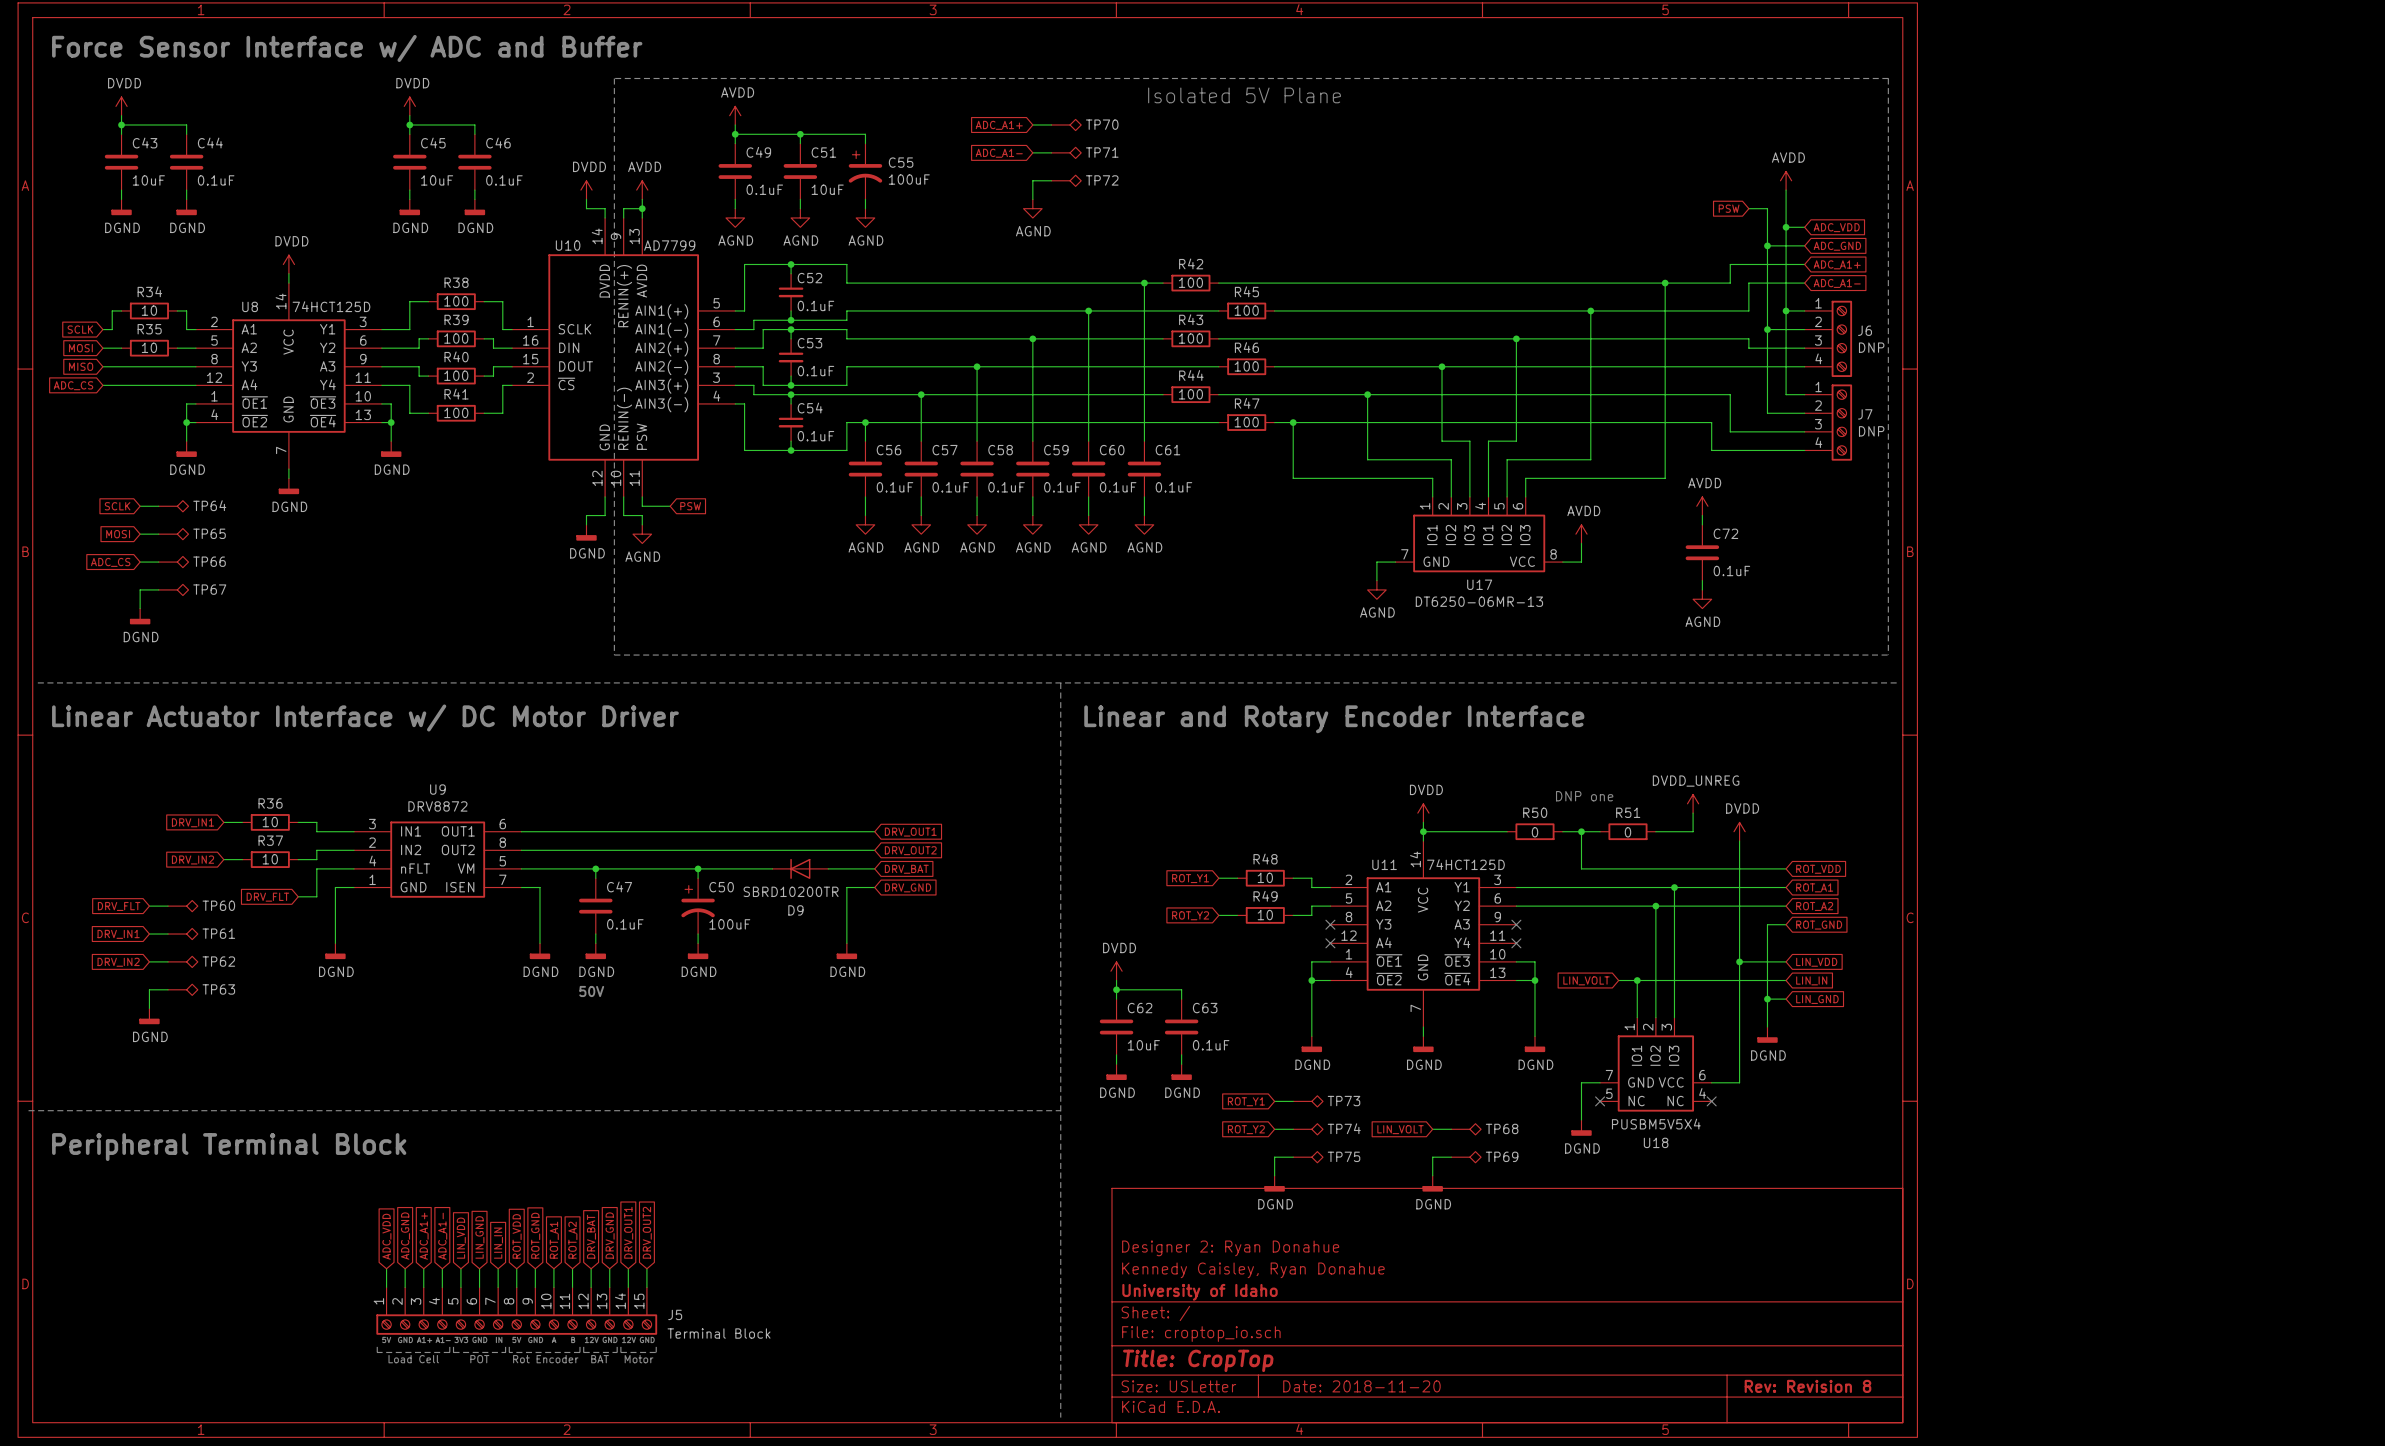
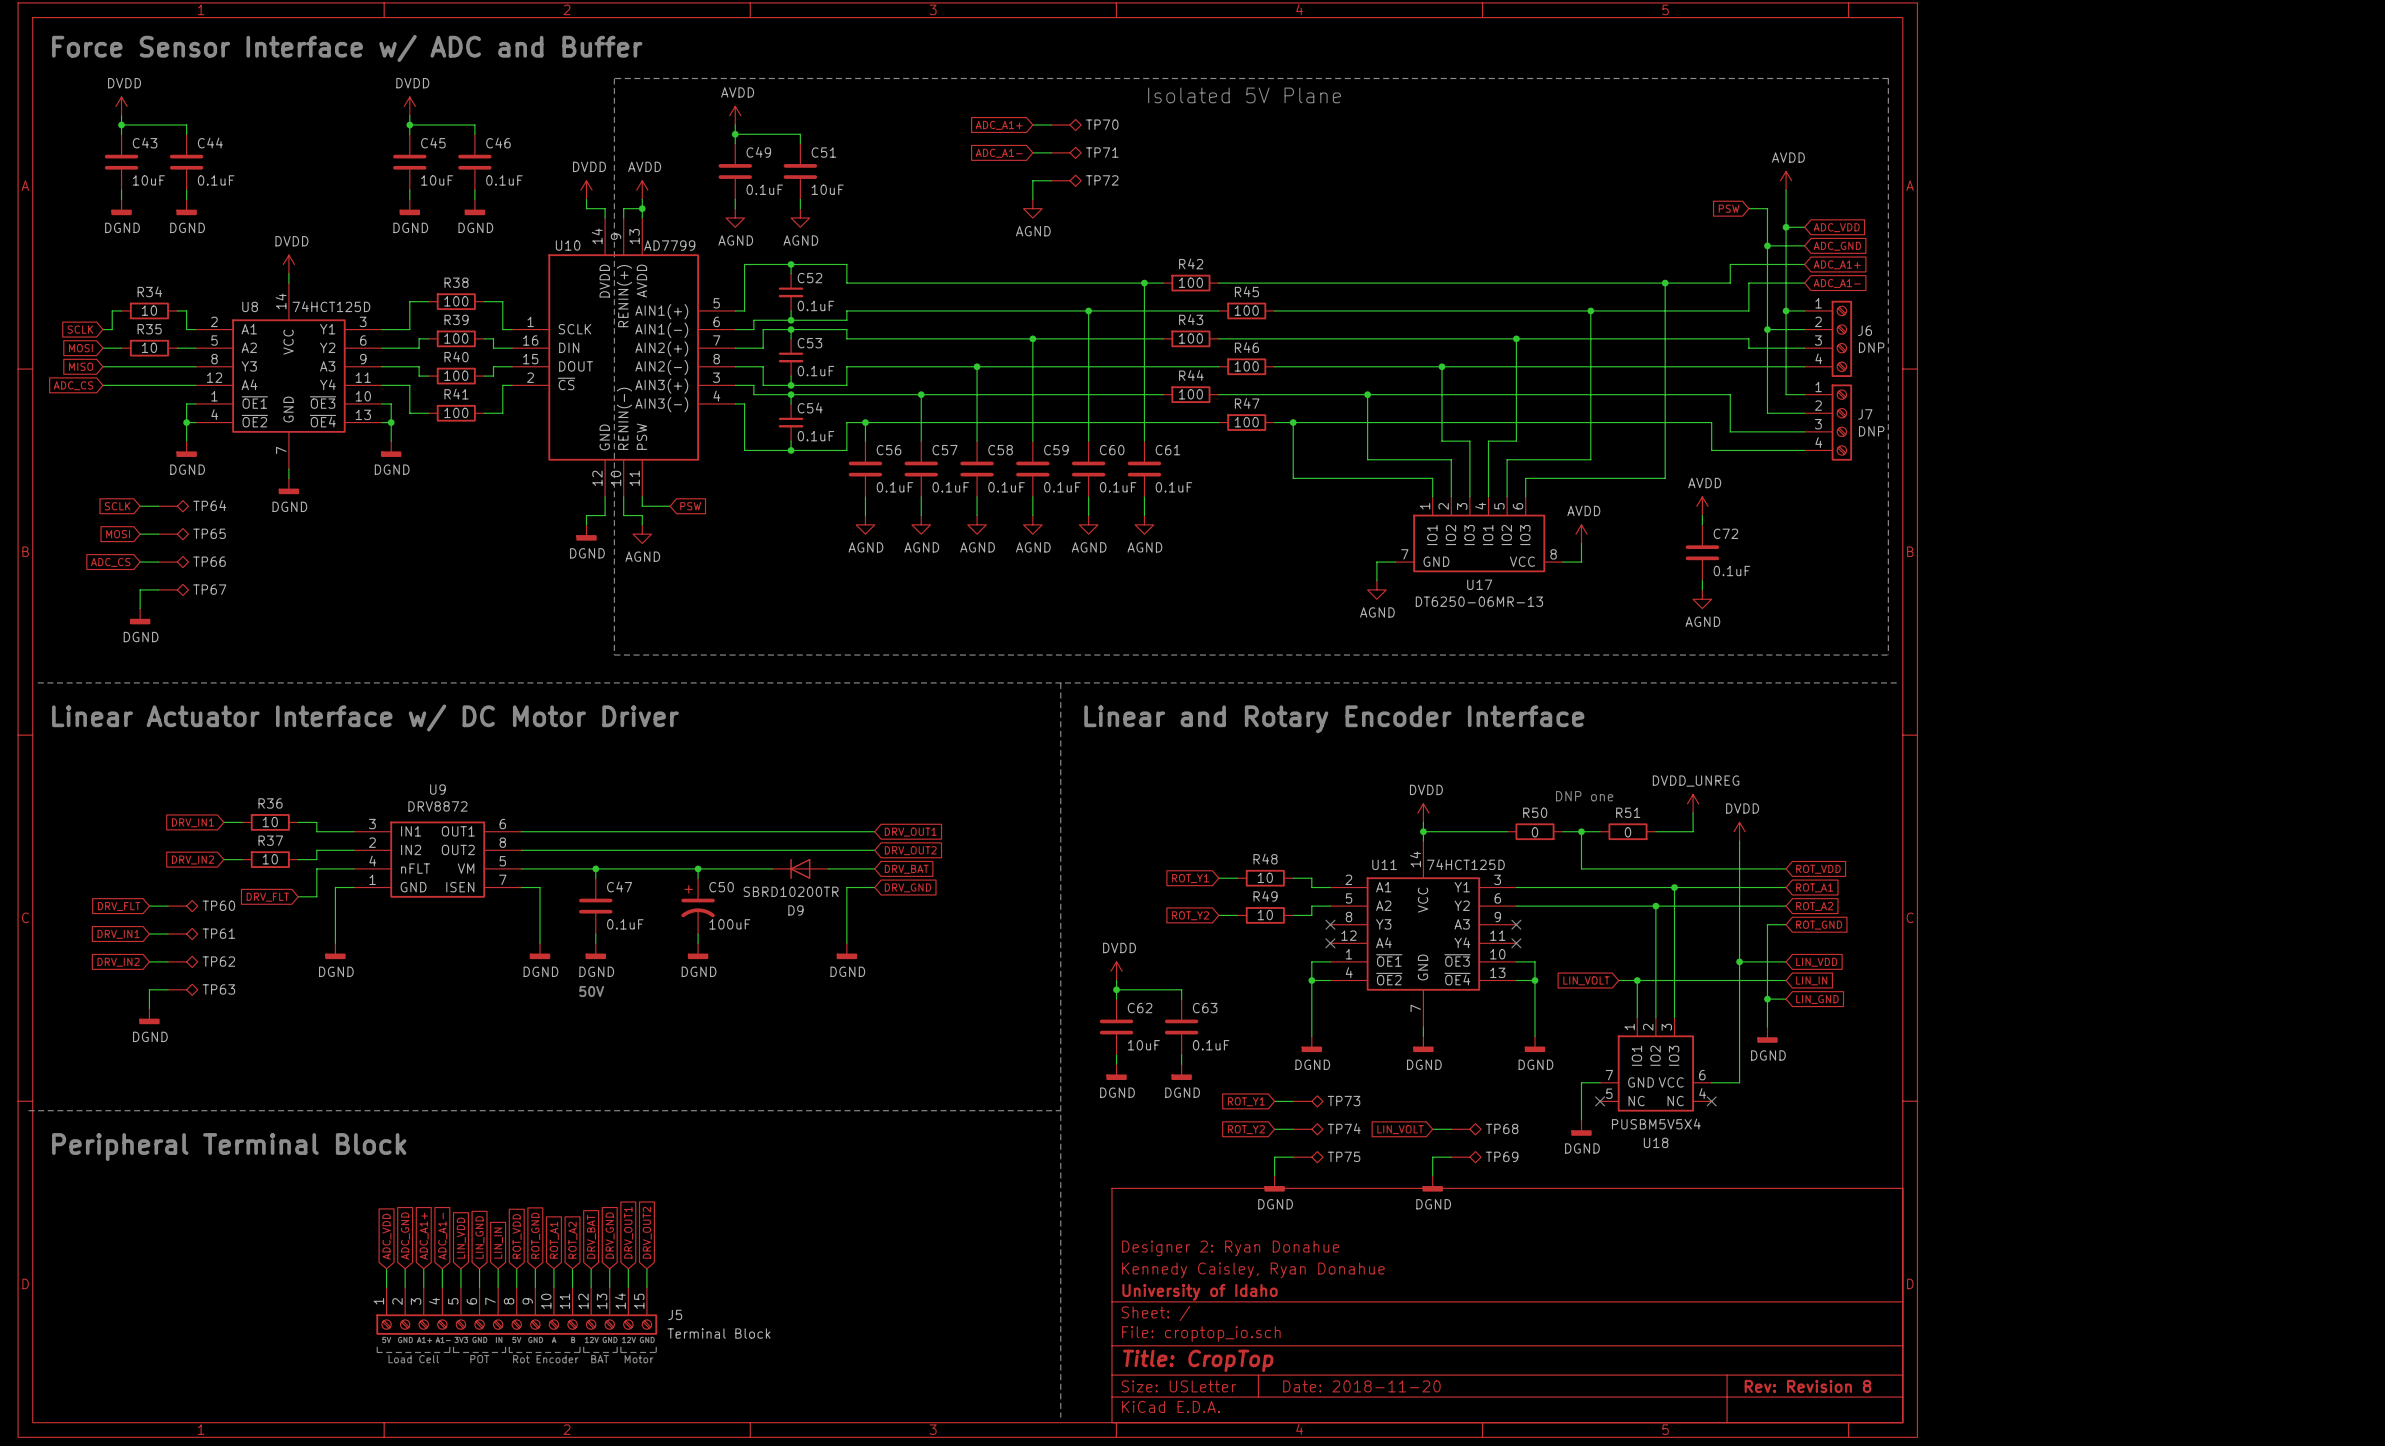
wire: (800, 134) (865, 134) (865, 143) -> none
junction: (800, 134) -> none
C55: 100uF (865, 171) -> none
wire: (865, 199) (865, 208) -> none
power symbol: AGND (865, 217) -> none

